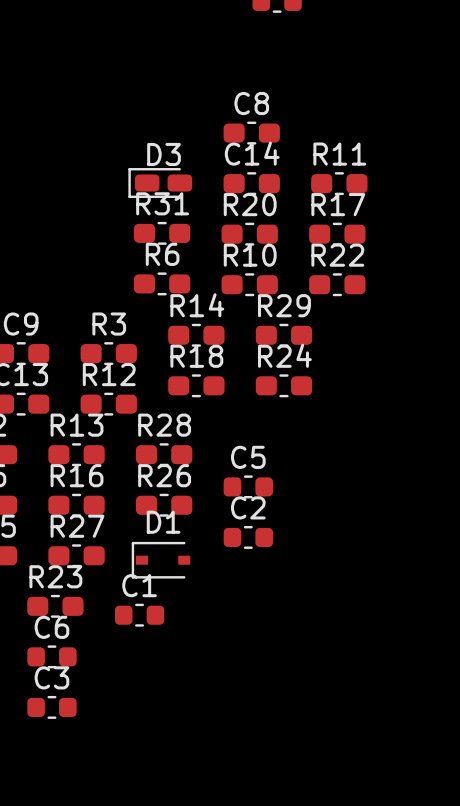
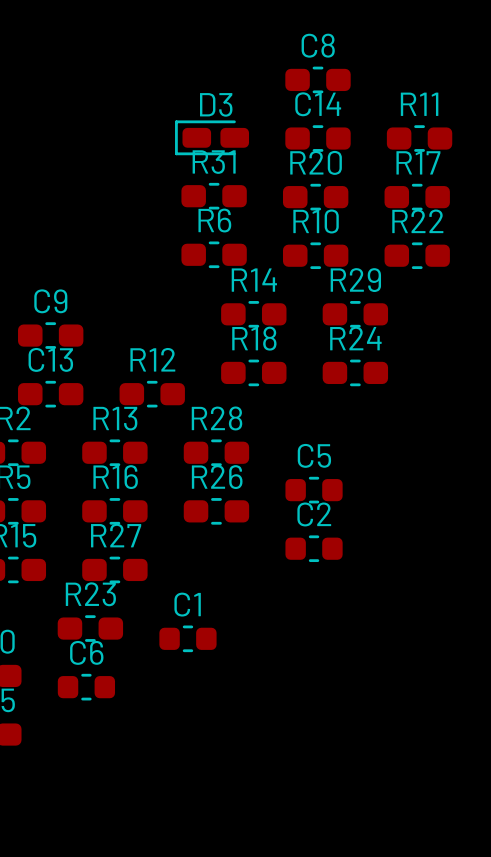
R3: (108, 353) -> none
D1: (161, 560) -> none
C3: (51, 707) -> none

